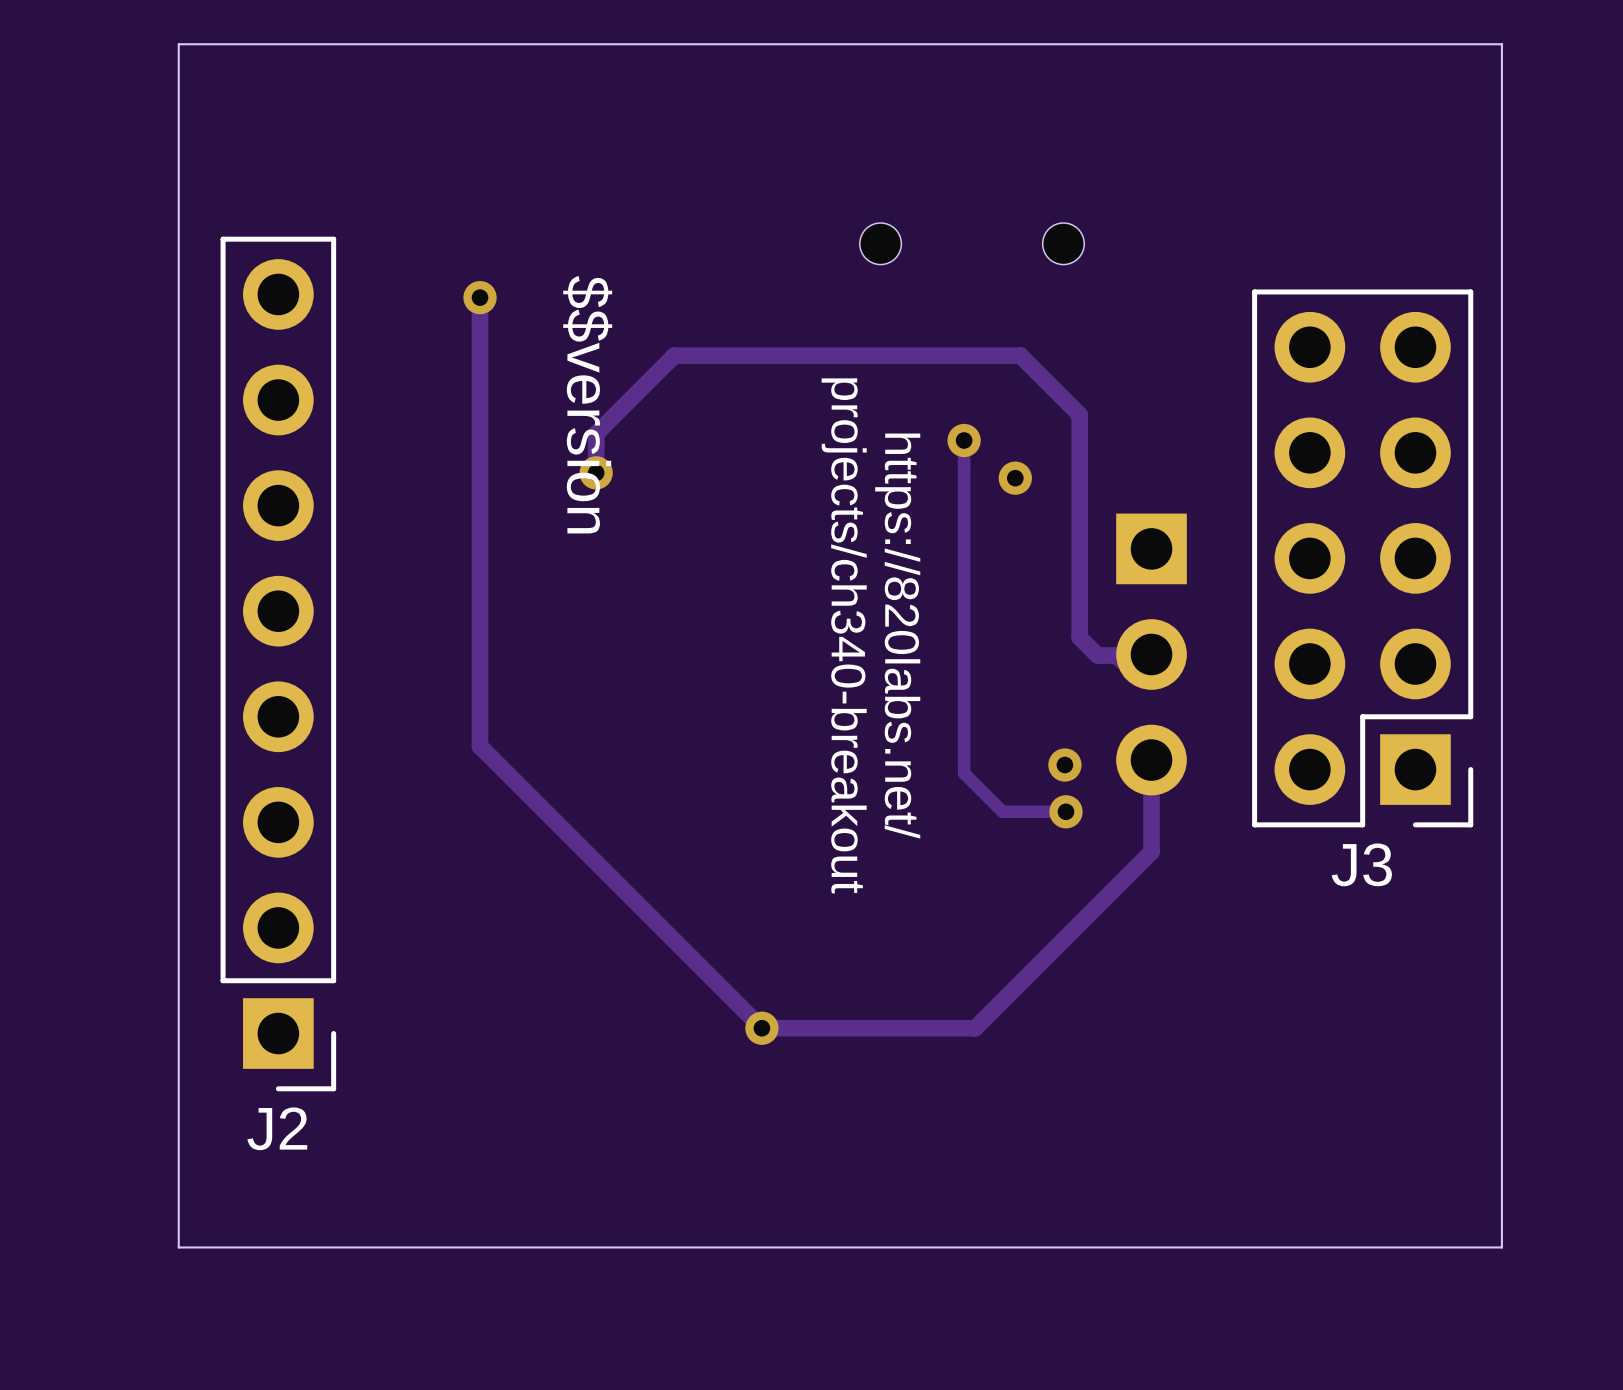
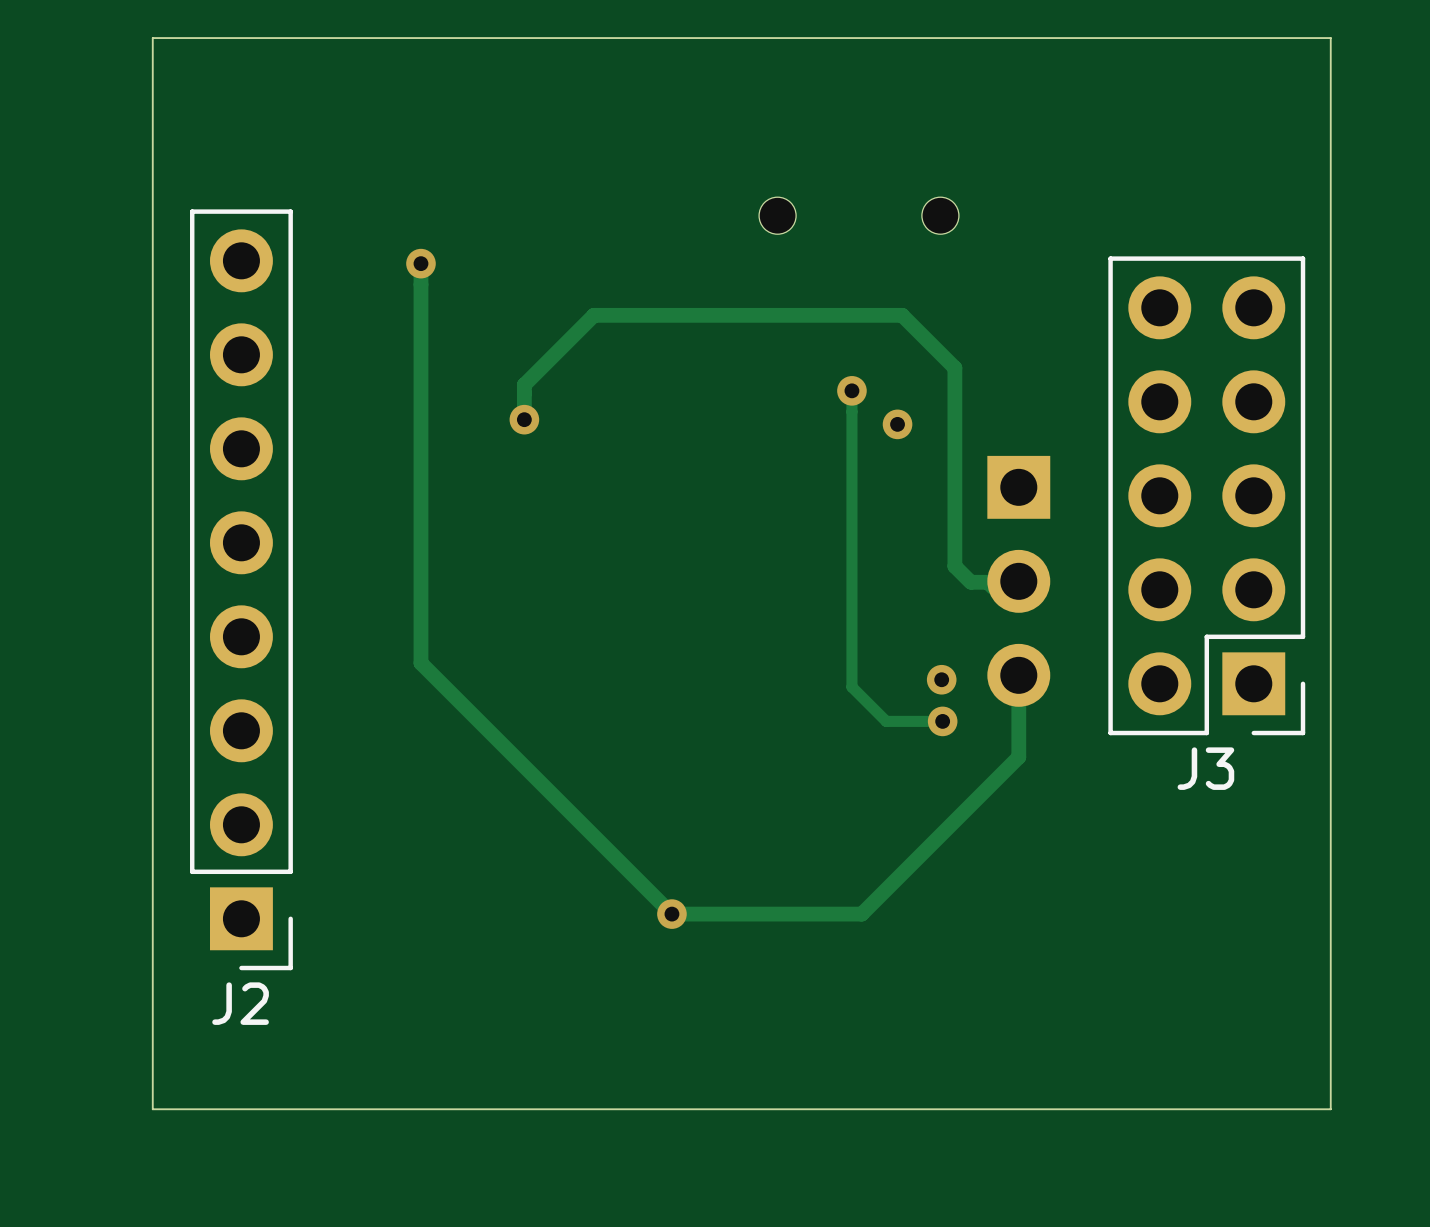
text: $$version (587, 404) -> none
text: projects/ch340-breakout (844, 635) -> none
text: https://820labs.net/ (897, 636) -> none

